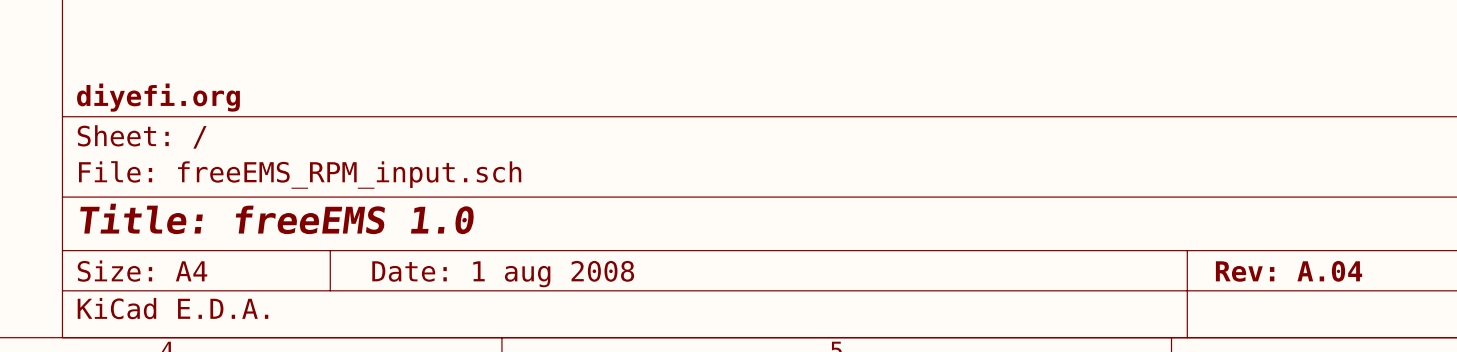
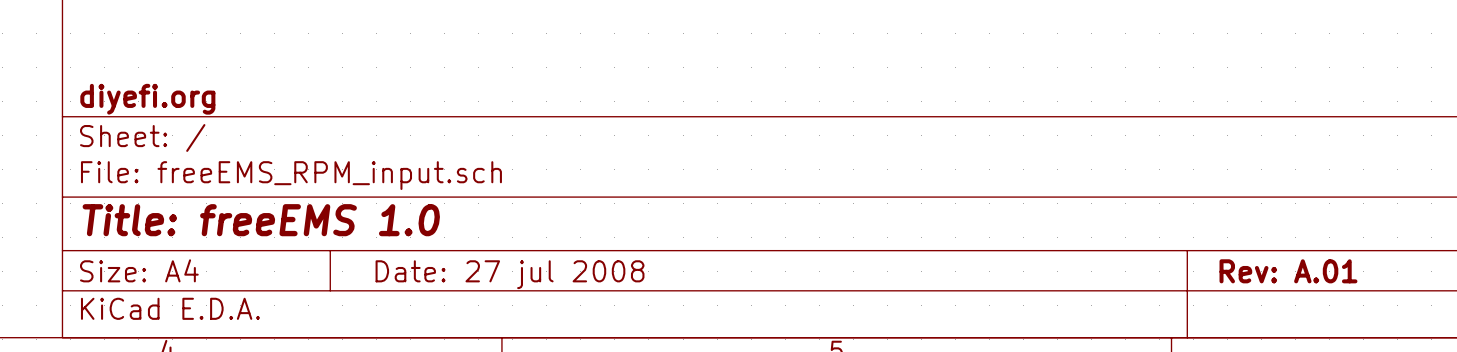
title block: Rev: A.04 (1289, 271) -> Rev: A.01 (1288, 271)
title block: Date: 1 aug 2008 (503, 274) -> Date: 27 jul 2008 (510, 274)

